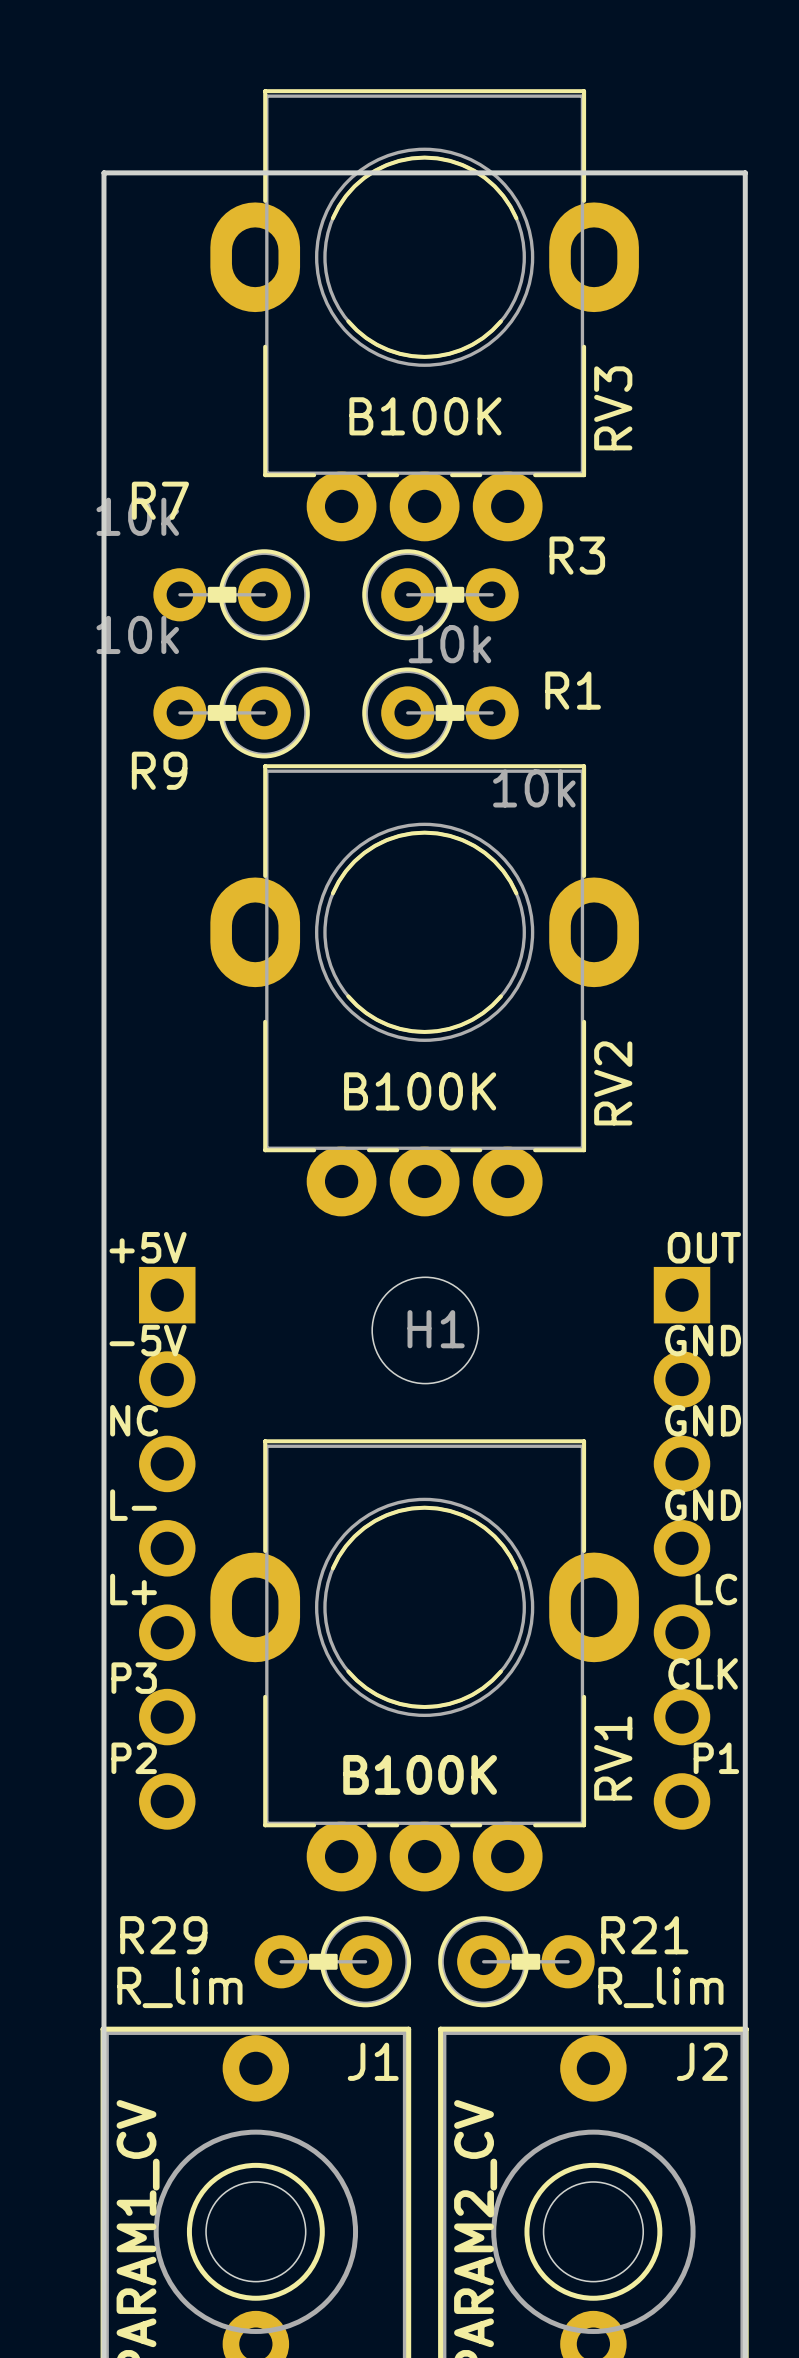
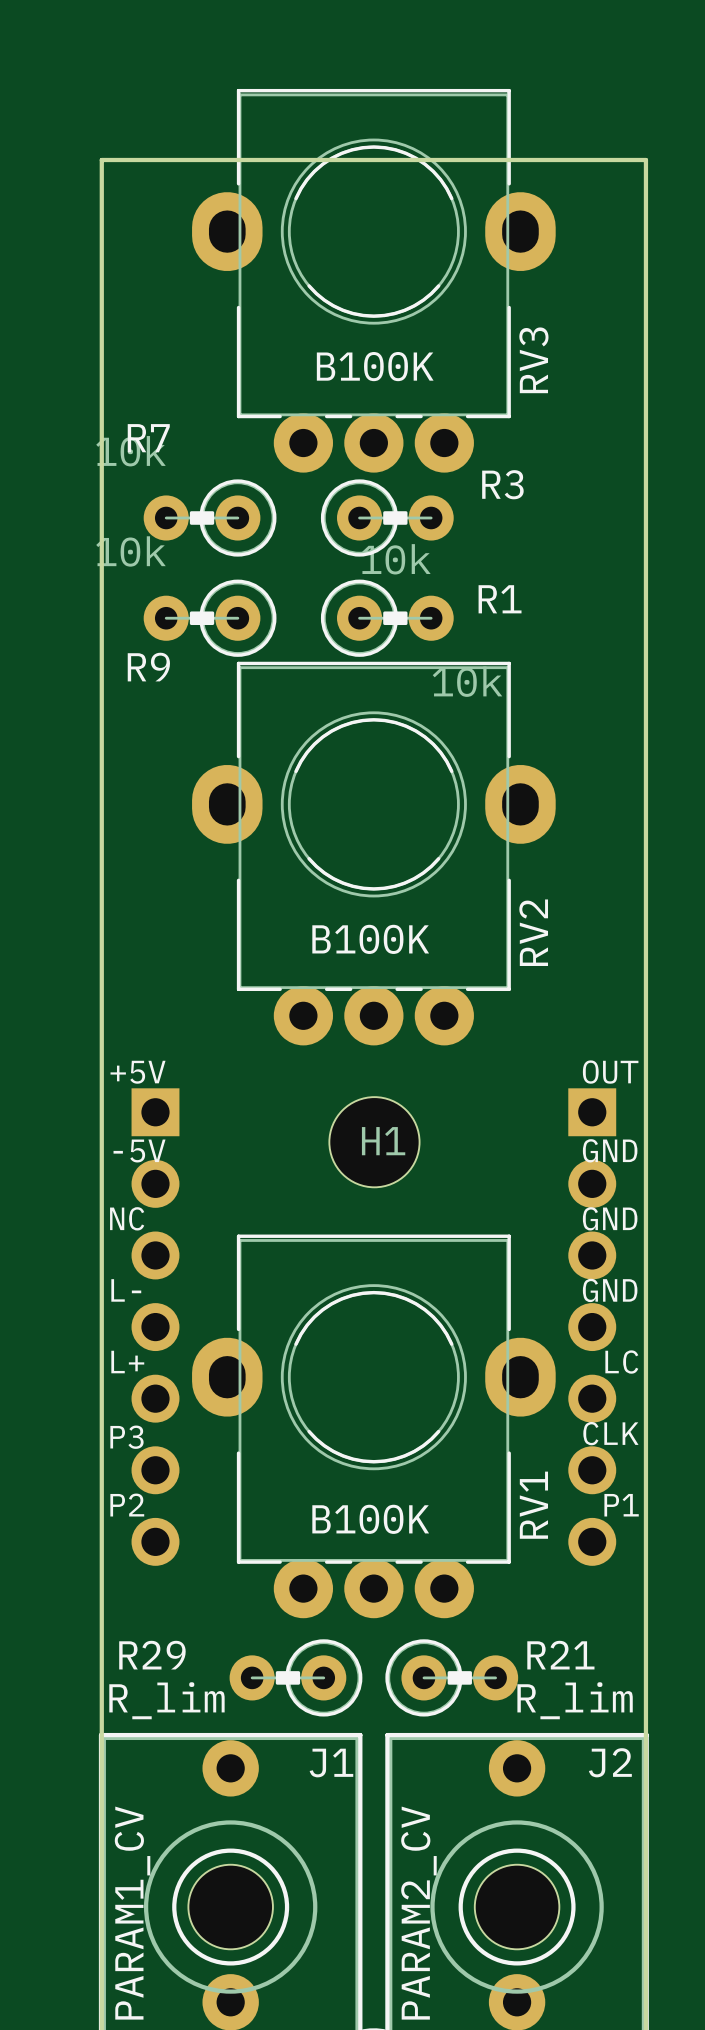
RV3 footprint: [210, 89, 639, 542] -> [192, 88, 556, 473]
RV2 footprint: [210, 764, 639, 1217] -> [192, 661, 556, 1046]
RV1 footprint: [210, 1439, 639, 1892] -> [192, 1234, 556, 1619]

